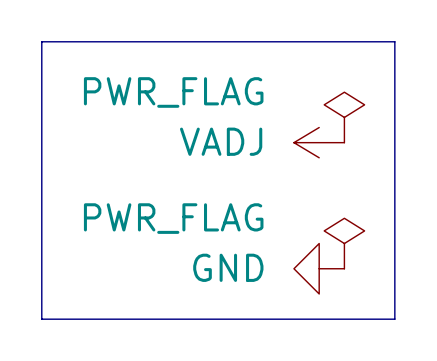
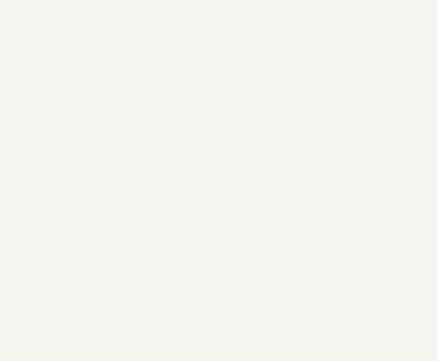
line: (41, 41) (41, 319) (394, 319) (394, 41) (41, 41) -> none
power symbol: PWR_FLAG (344, 117) -> none
power symbol: VADJ (319, 142) -> none
power symbol: PWR_FLAG (344, 243) -> none
power symbol: GND (319, 268) -> none

